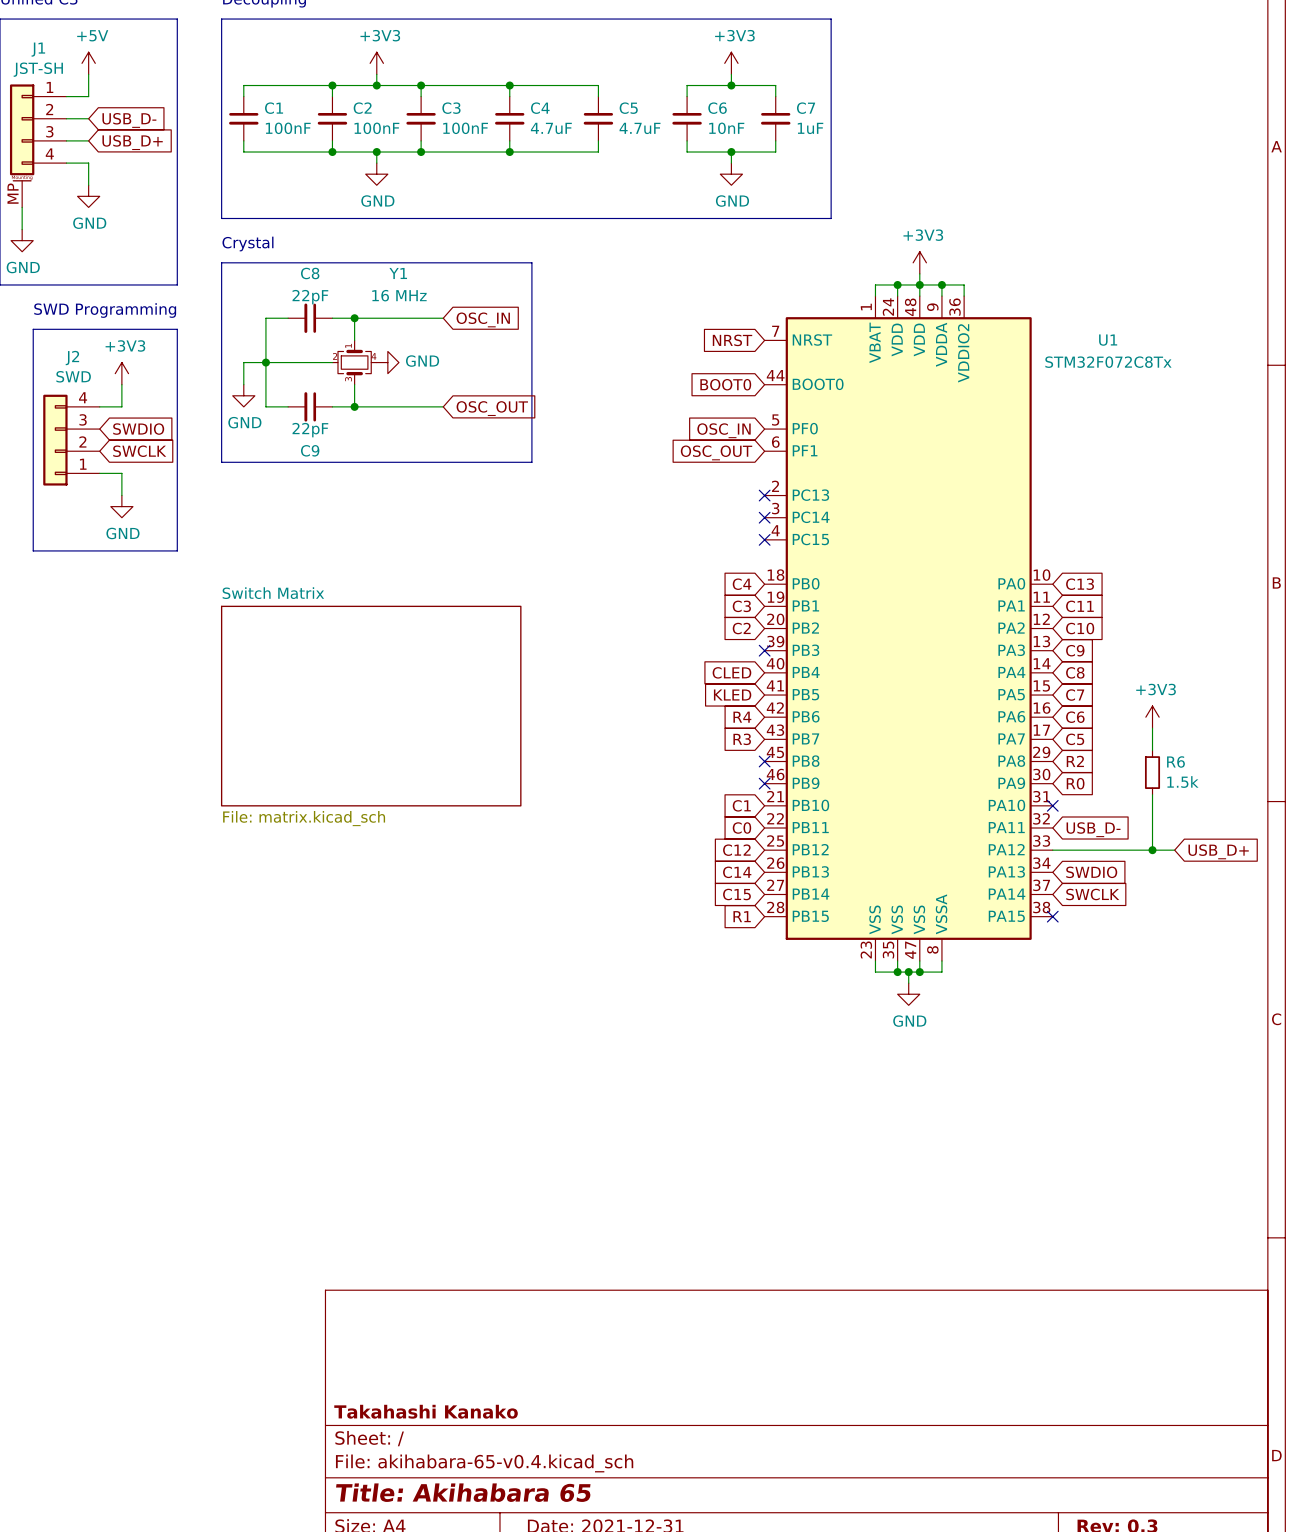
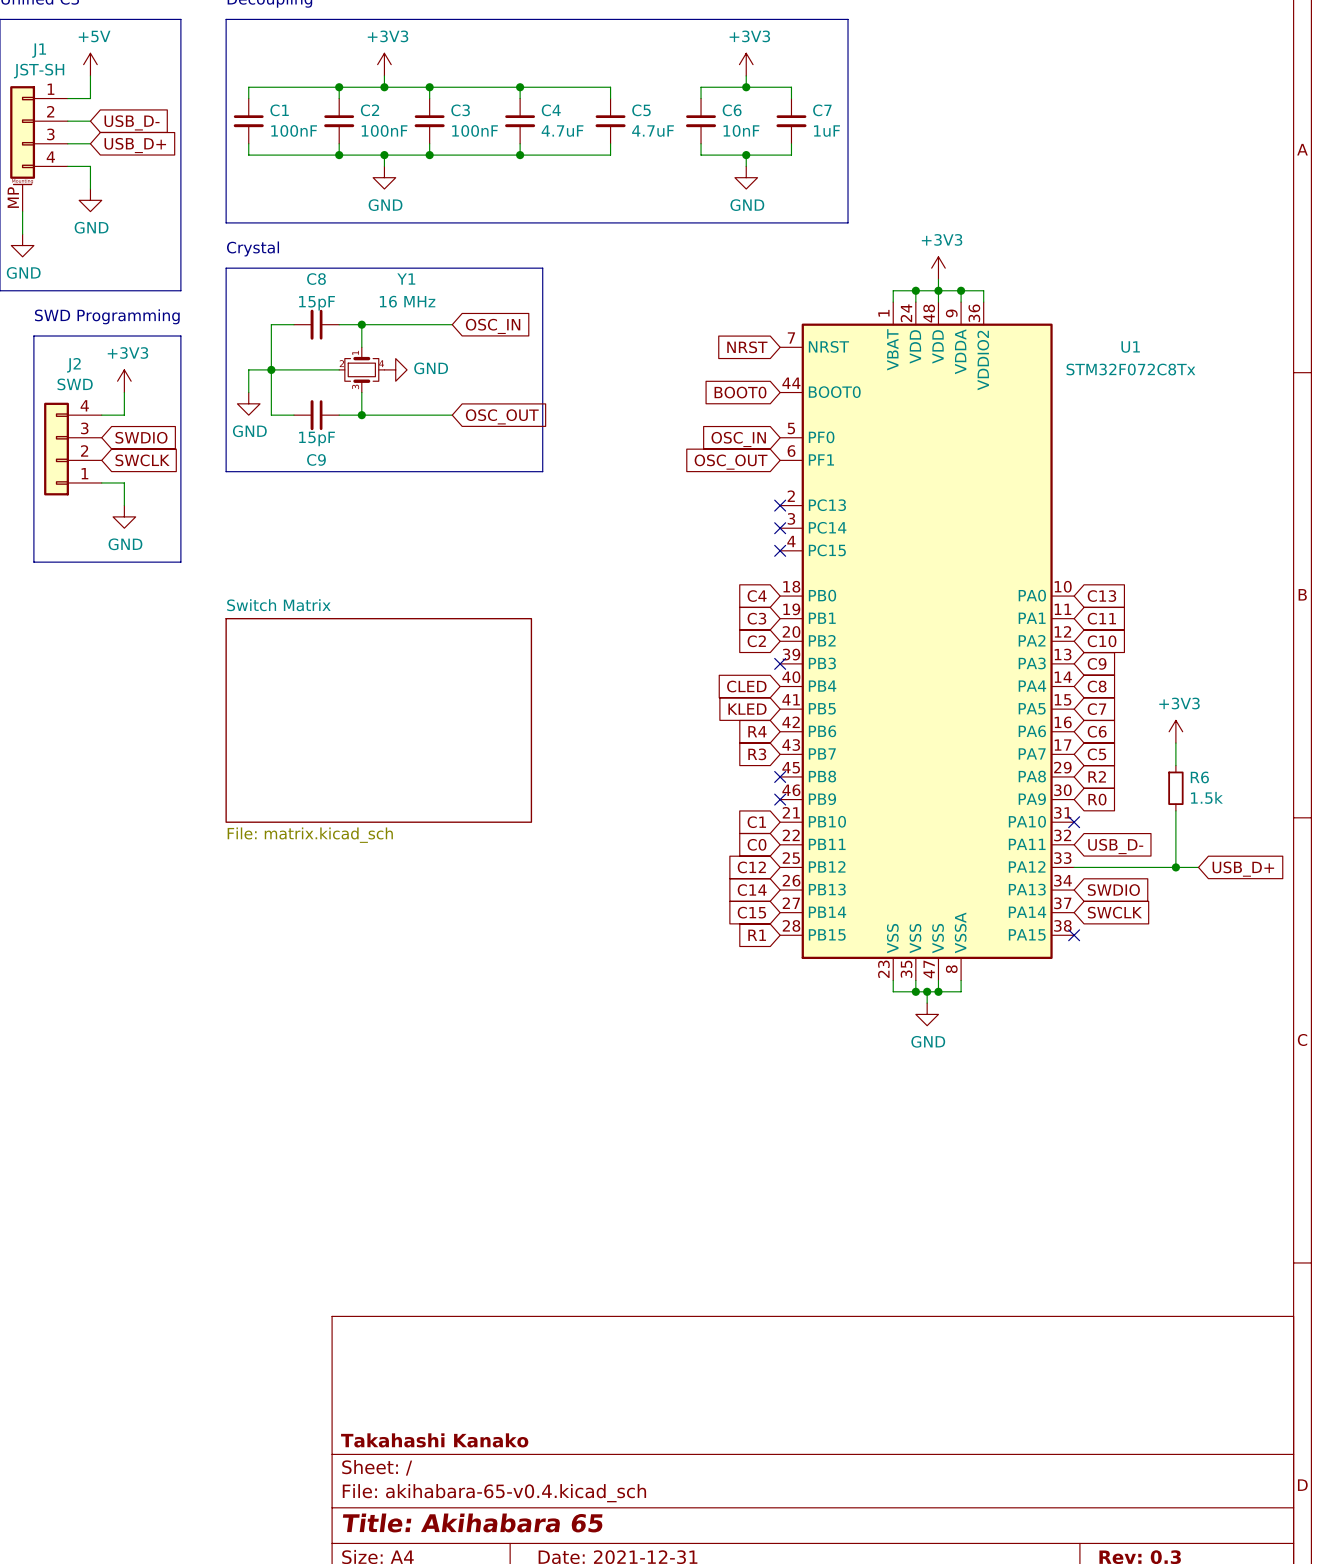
C8 value: 22pF (310, 297) -> 15pF (316, 303)
C9 value: 22pF (310, 430) -> 15pF (316, 438)

